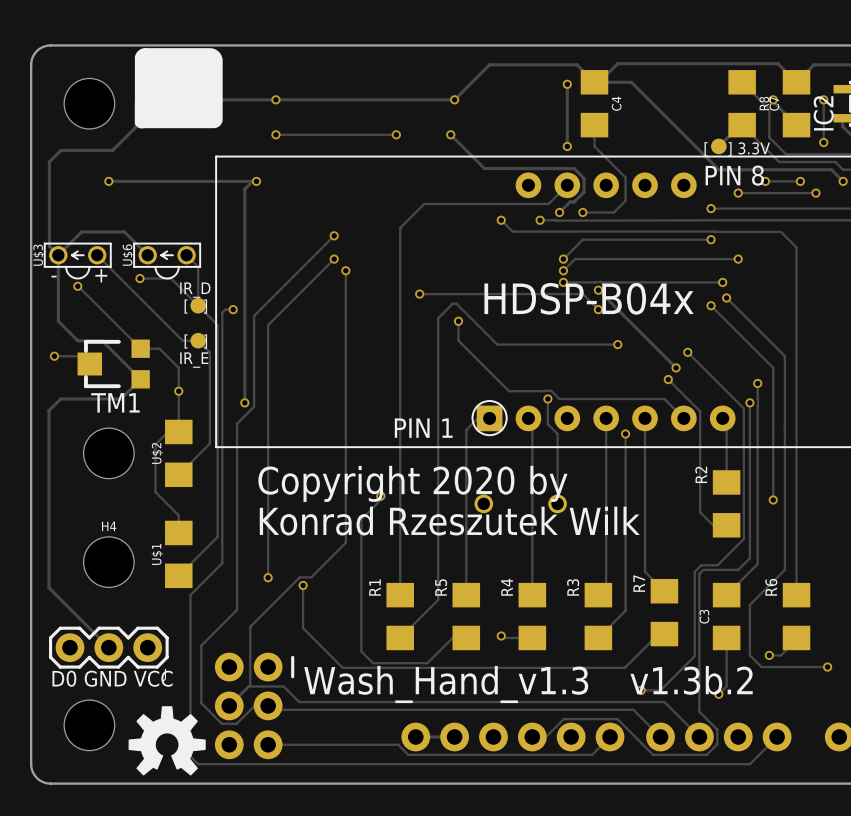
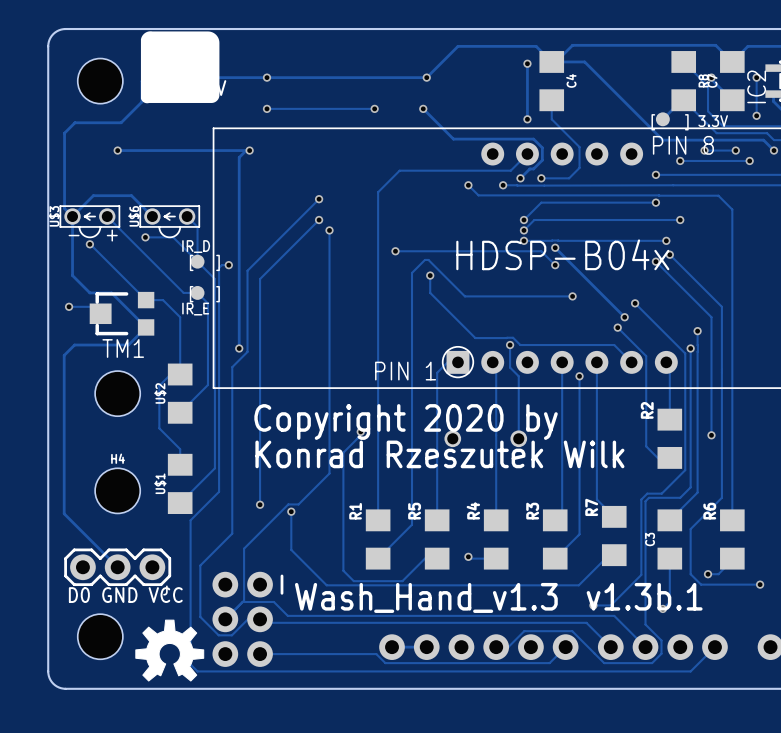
via: (178, 391) -> none
text: v1.3b.2 (691, 680) -> v1.3b.1 (644, 596)

